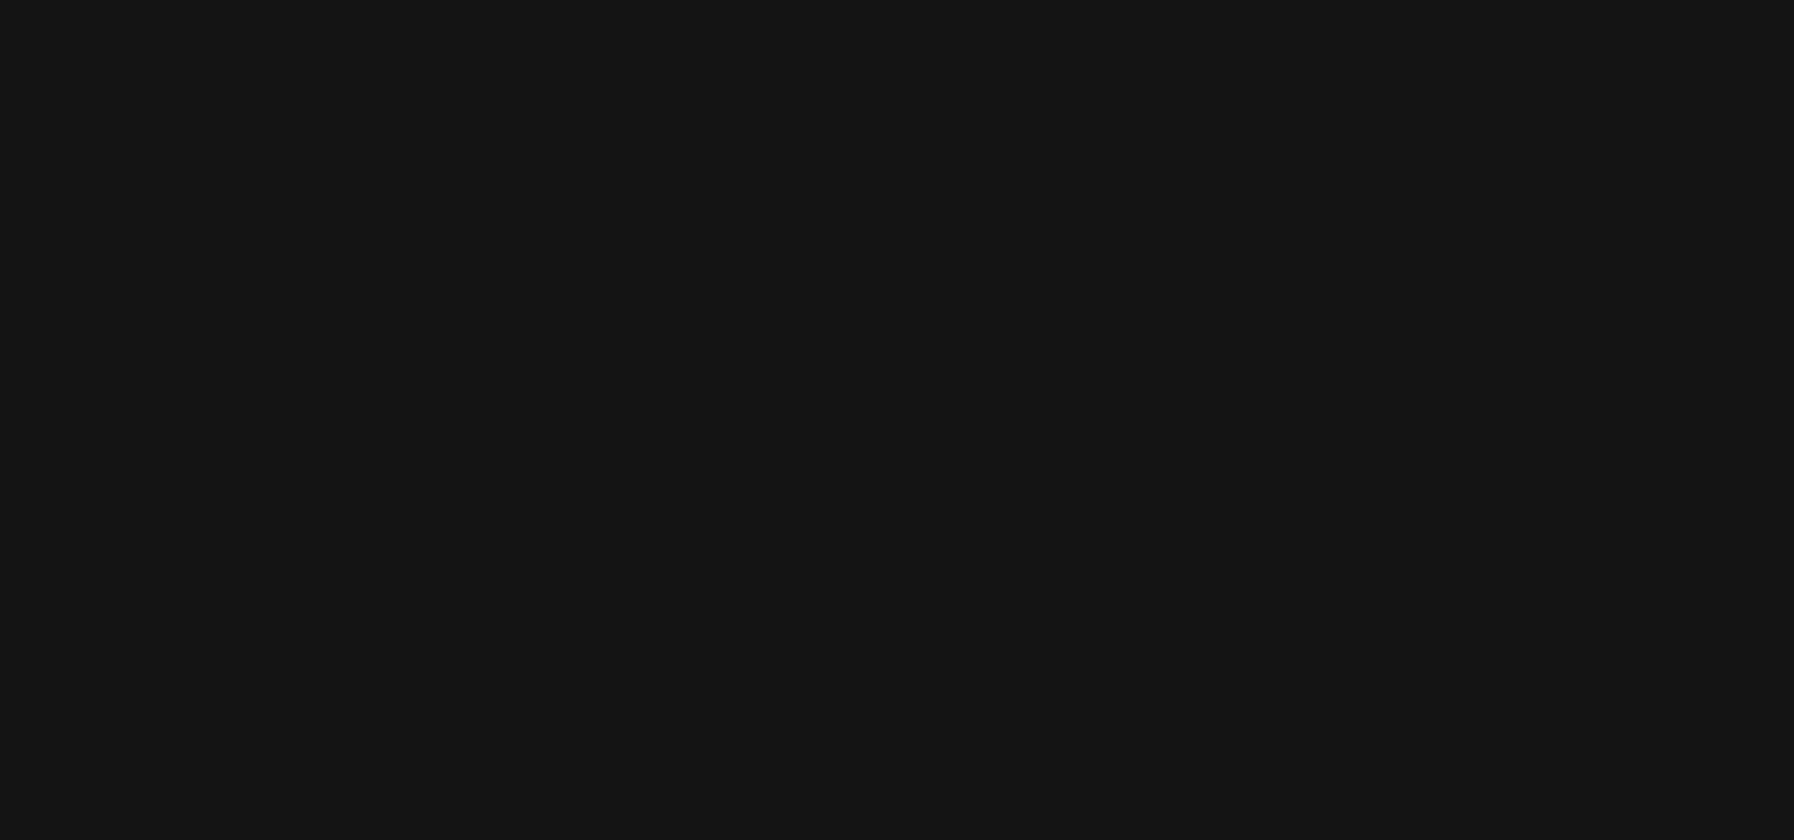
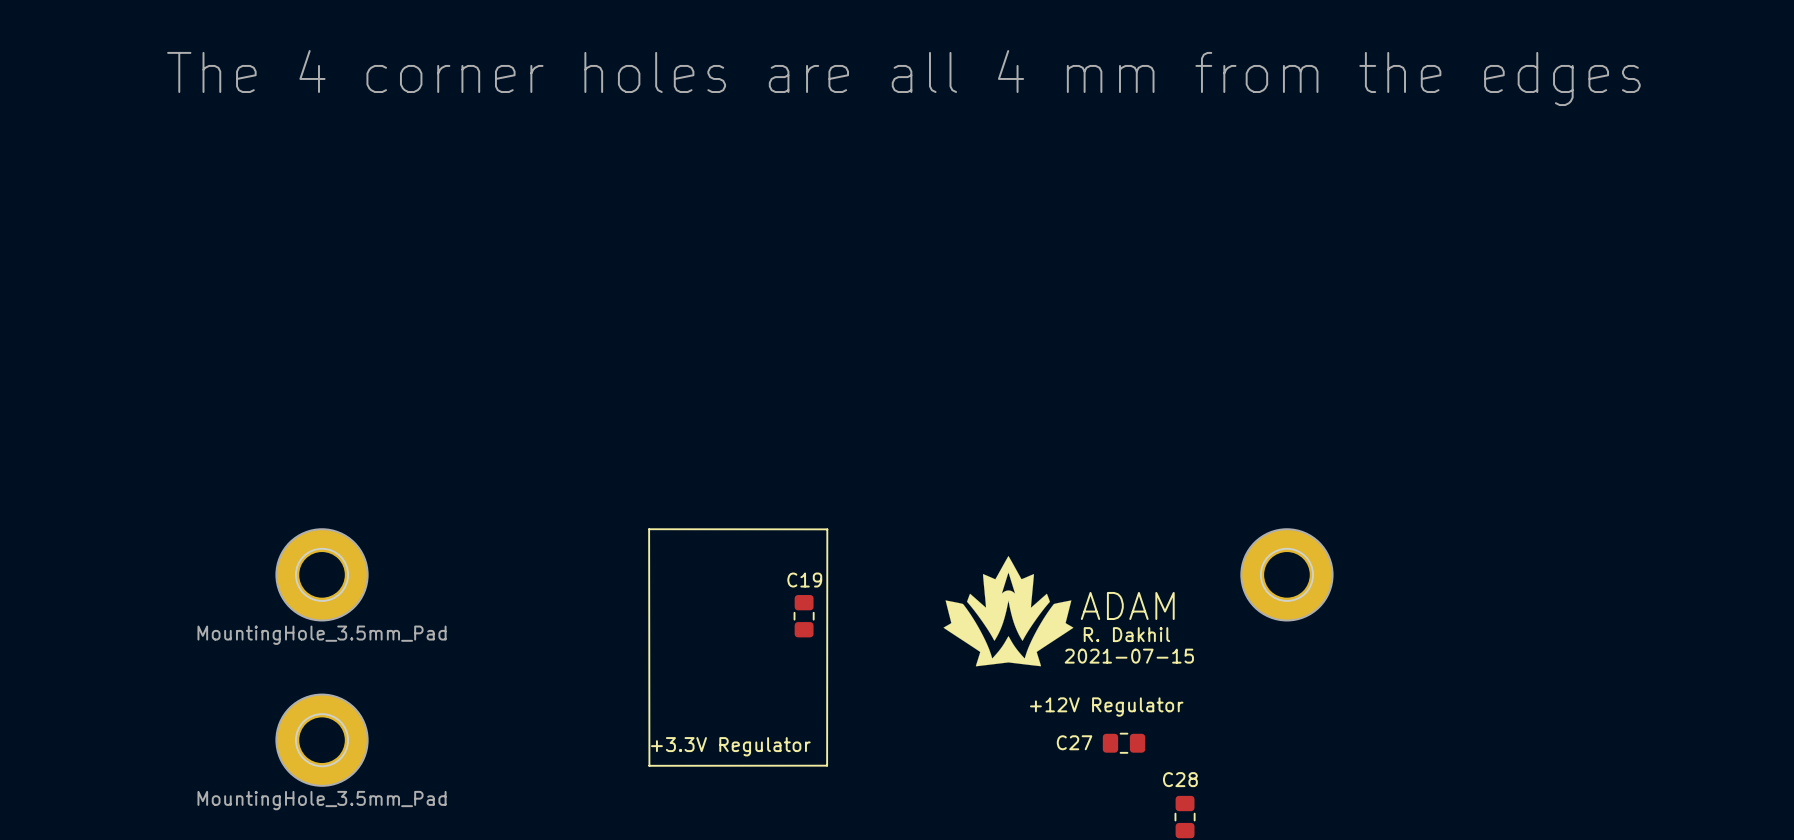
text: none -> The 4 corner holes are all 4 mm from the edges (903, 78)
line: none -> (827, 529) (649, 529) (649, 765)
line: none -> (827, 529) (827, 765)
round board edge: none -> [295, 548, 349, 602]
round board edge: none -> [1260, 548, 1314, 602]
drawing: none -> [943, 556, 1074, 667]
part: none -> MountingHole_3.5mm_Pad (322, 574)
part: none -> (1286, 574)
text: none -> ADAM (1127, 605)
C19: none -> (804, 616)
text: none -> R. Dakhil (1126, 634)
text: none -> 2021-07-15 (1129, 656)
text: none -> +12V Regulator (1106, 707)
round board edge: none -> [295, 713, 349, 767]
part: none -> MountingHole_3.5mm_Pad (322, 740)
C27: none -> (1124, 743)
text: none -> +3.3V Regulator (730, 746)
line: none -> (827, 765) (649, 765)
C28: none -> (1185, 817)

